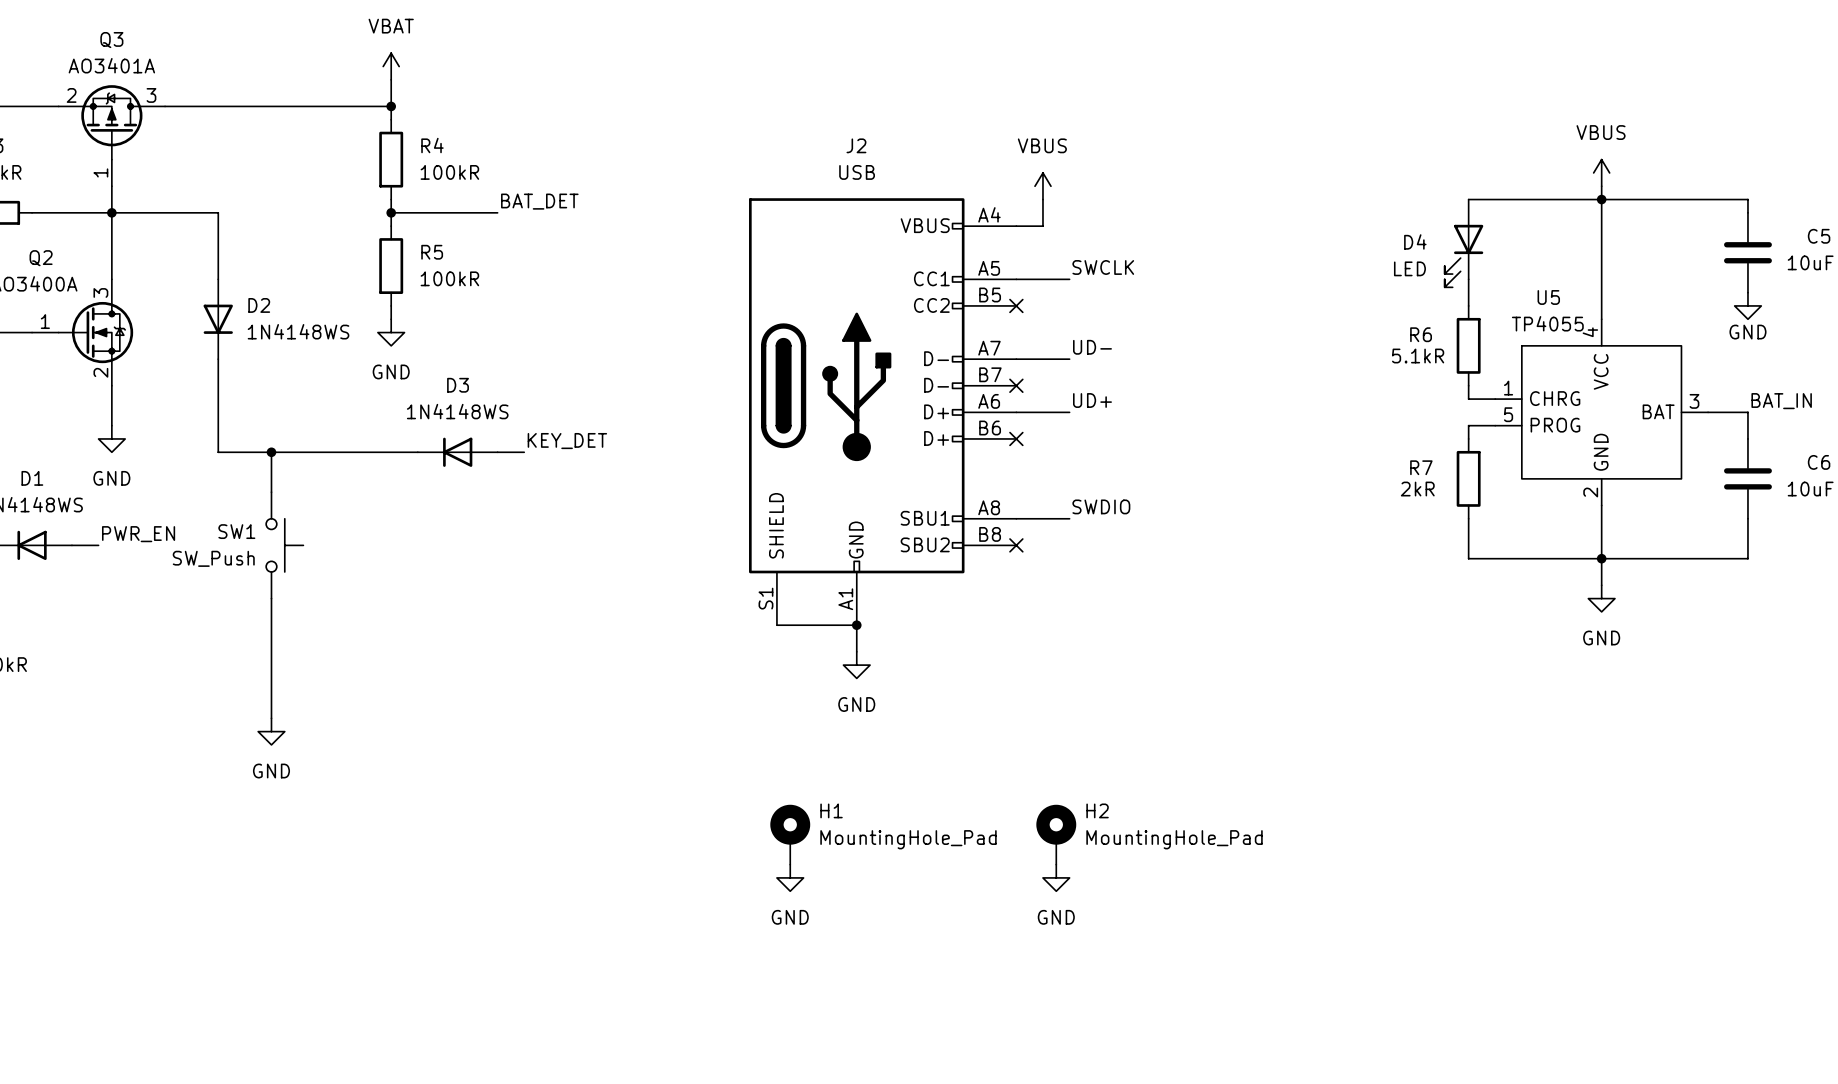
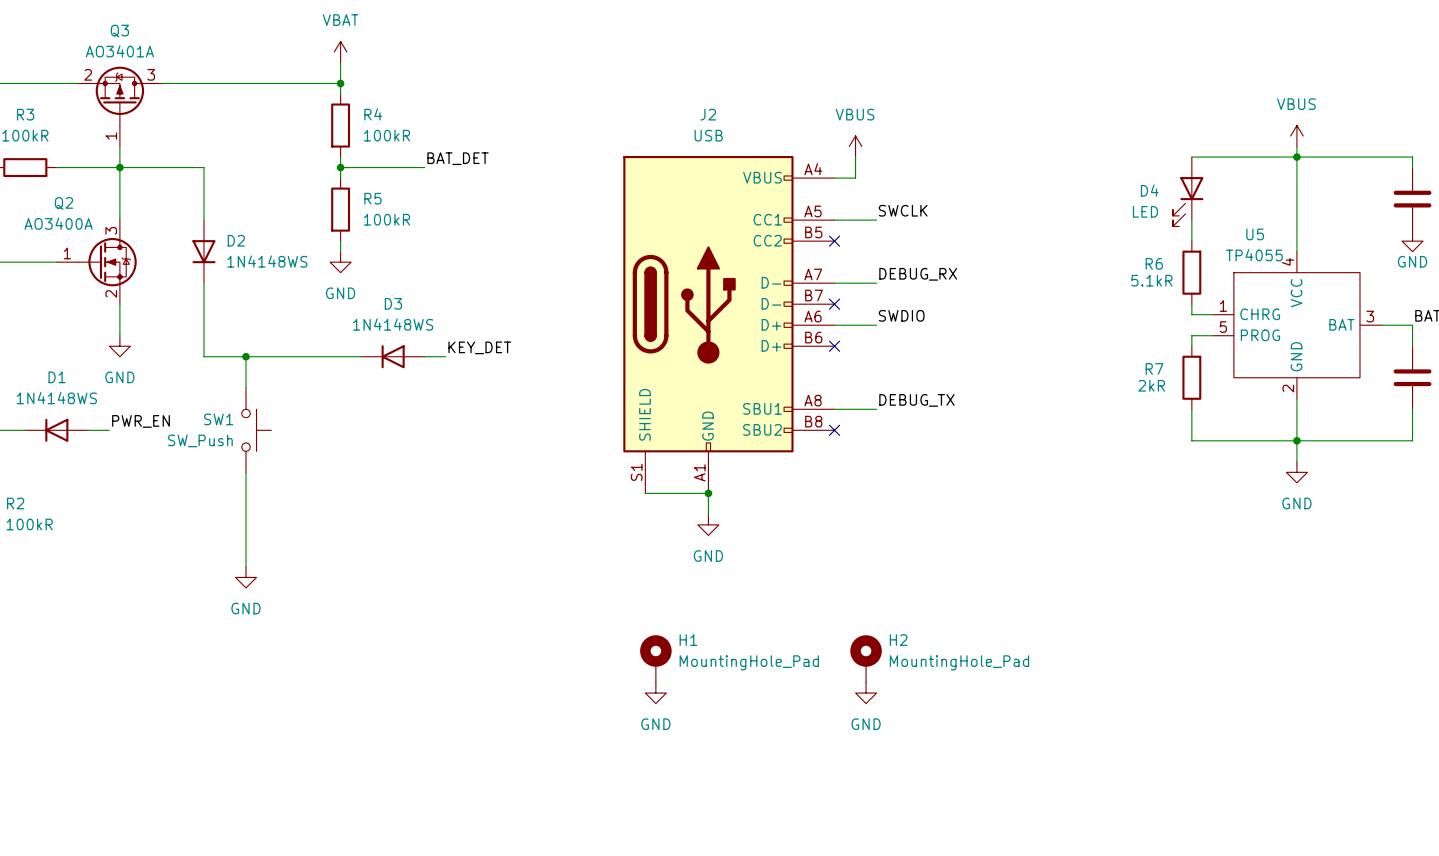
label: UD- (1092, 347) -> DEBUG_RX (918, 274)
label: UD+ (1092, 400) -> SWDIO (901, 315)
label: SWDIO (1101, 506) -> DEBUG_TX (916, 400)

